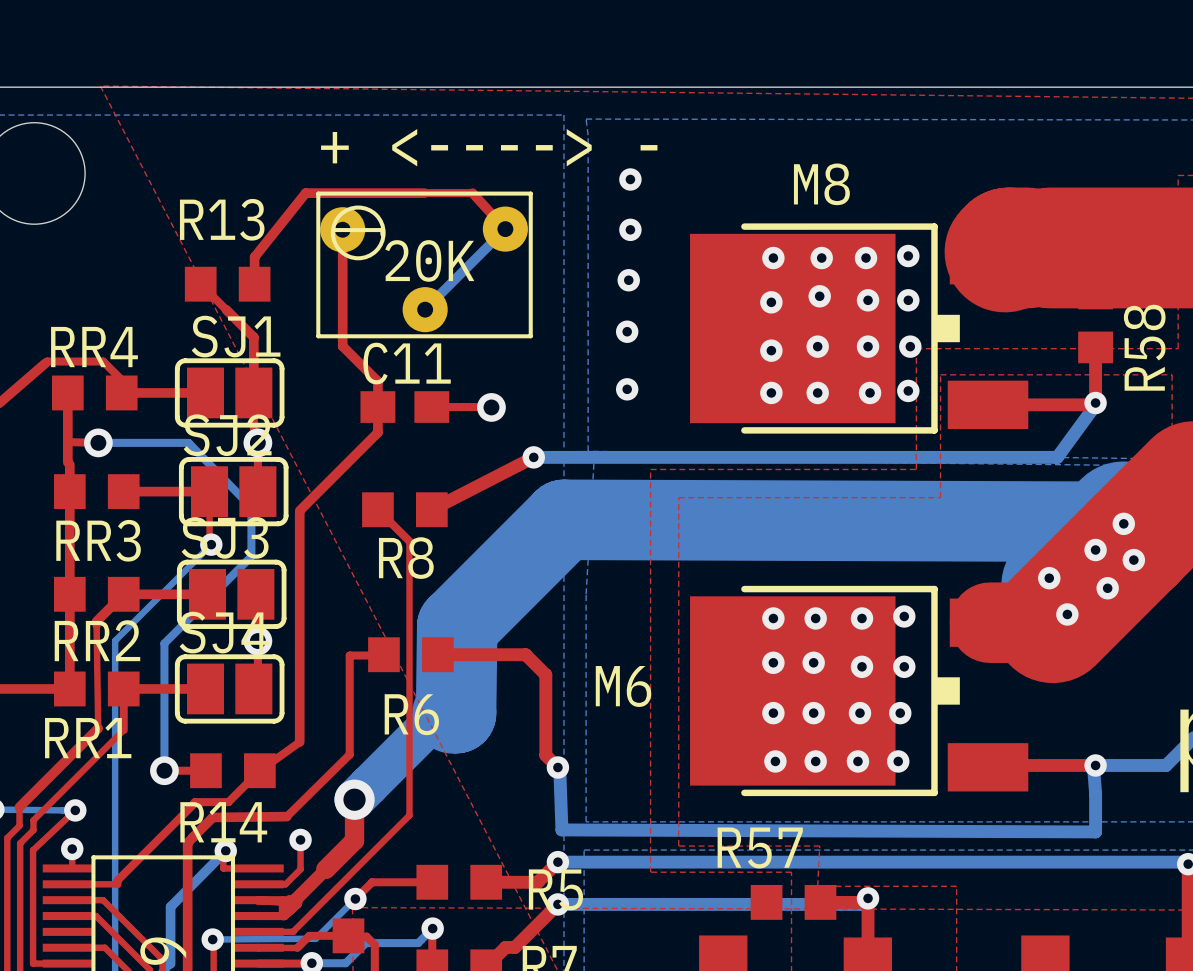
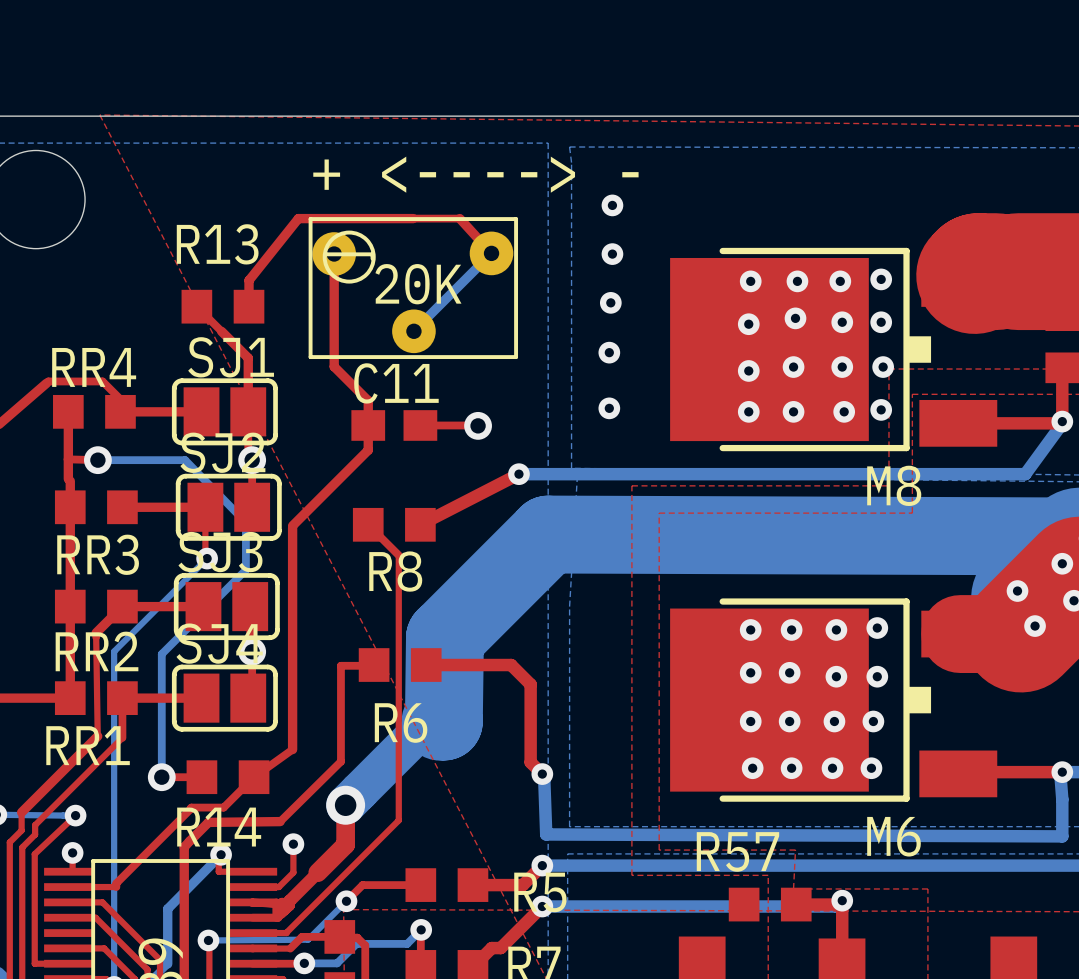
M8 name position: M8 (821, 184) -> M8 (894, 485)
M6 name position: M6 (623, 686) -> M6 (894, 836)

